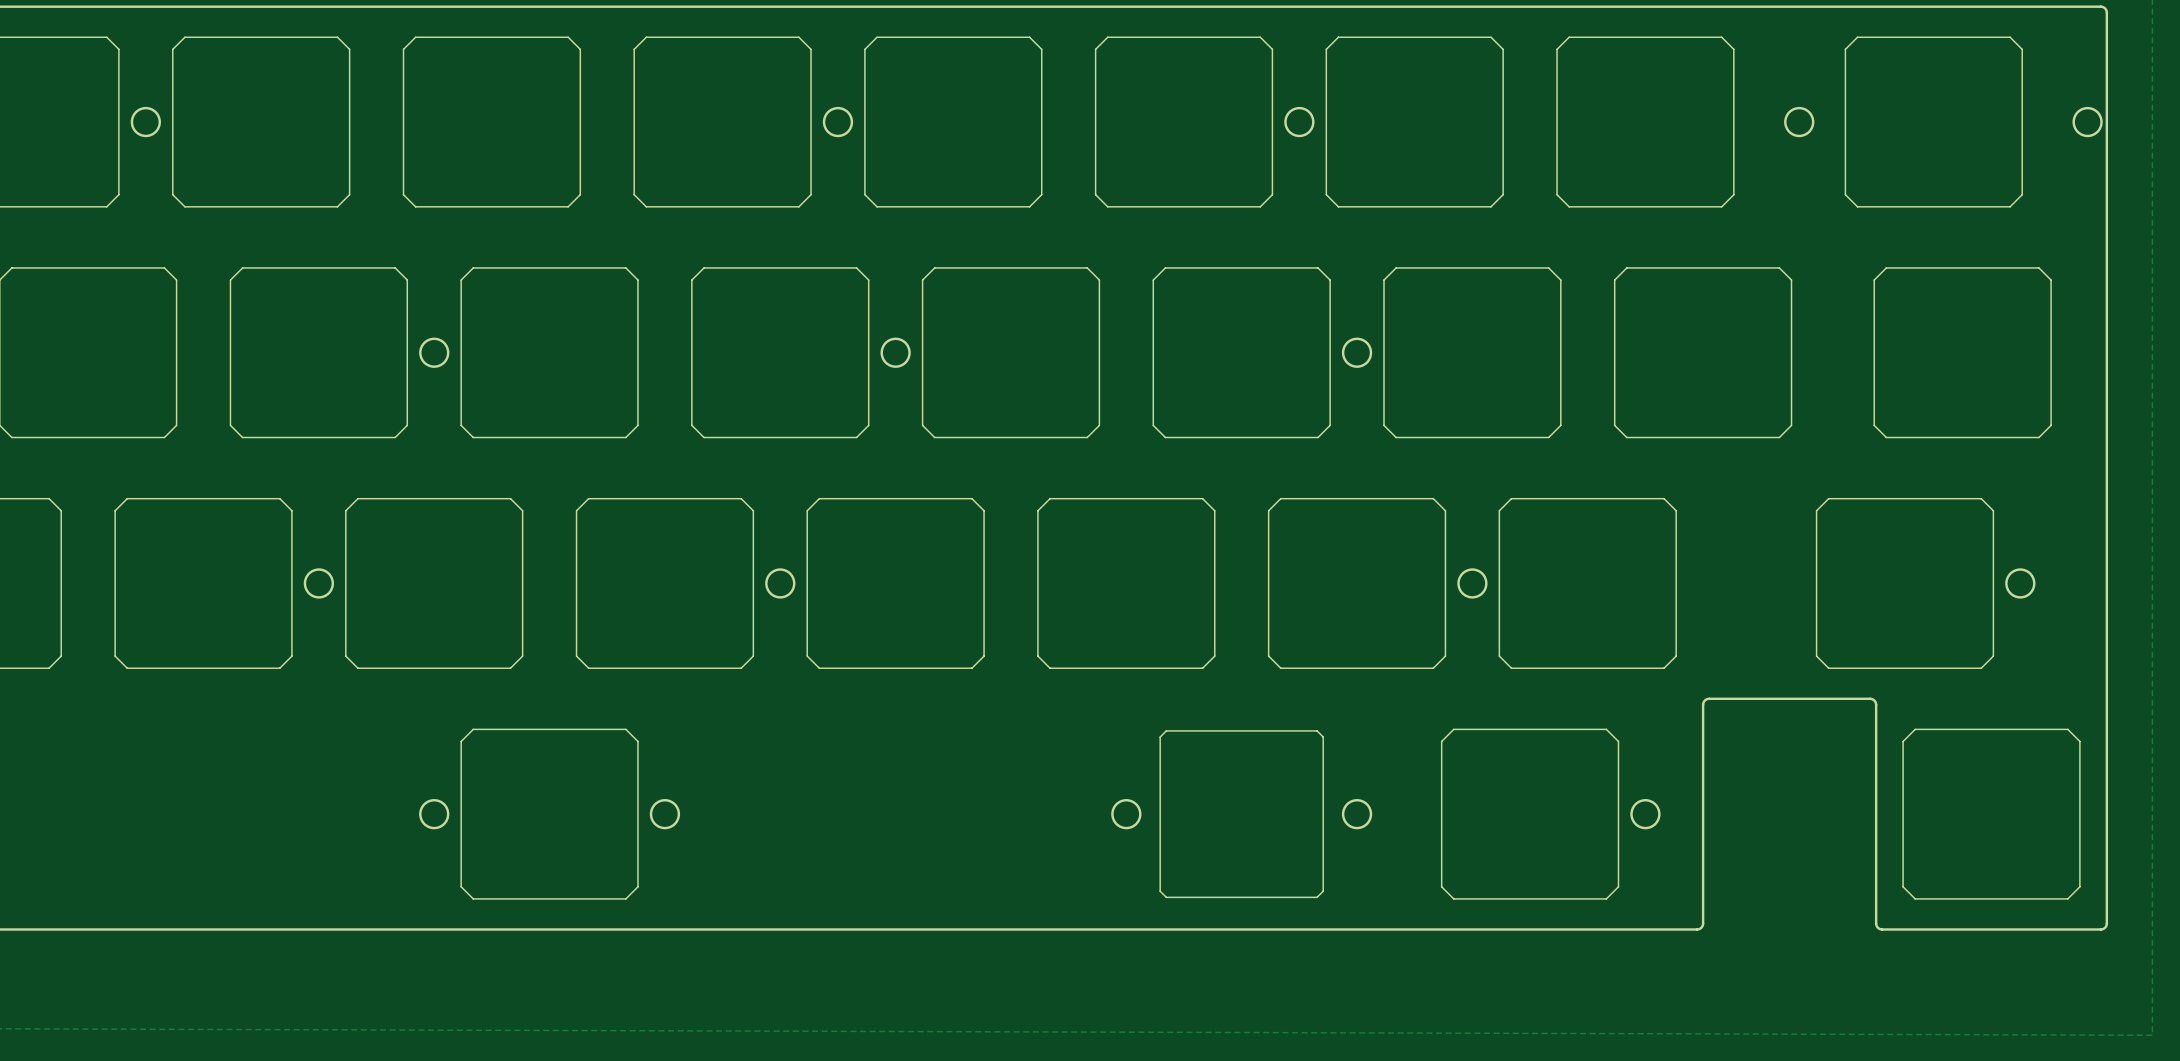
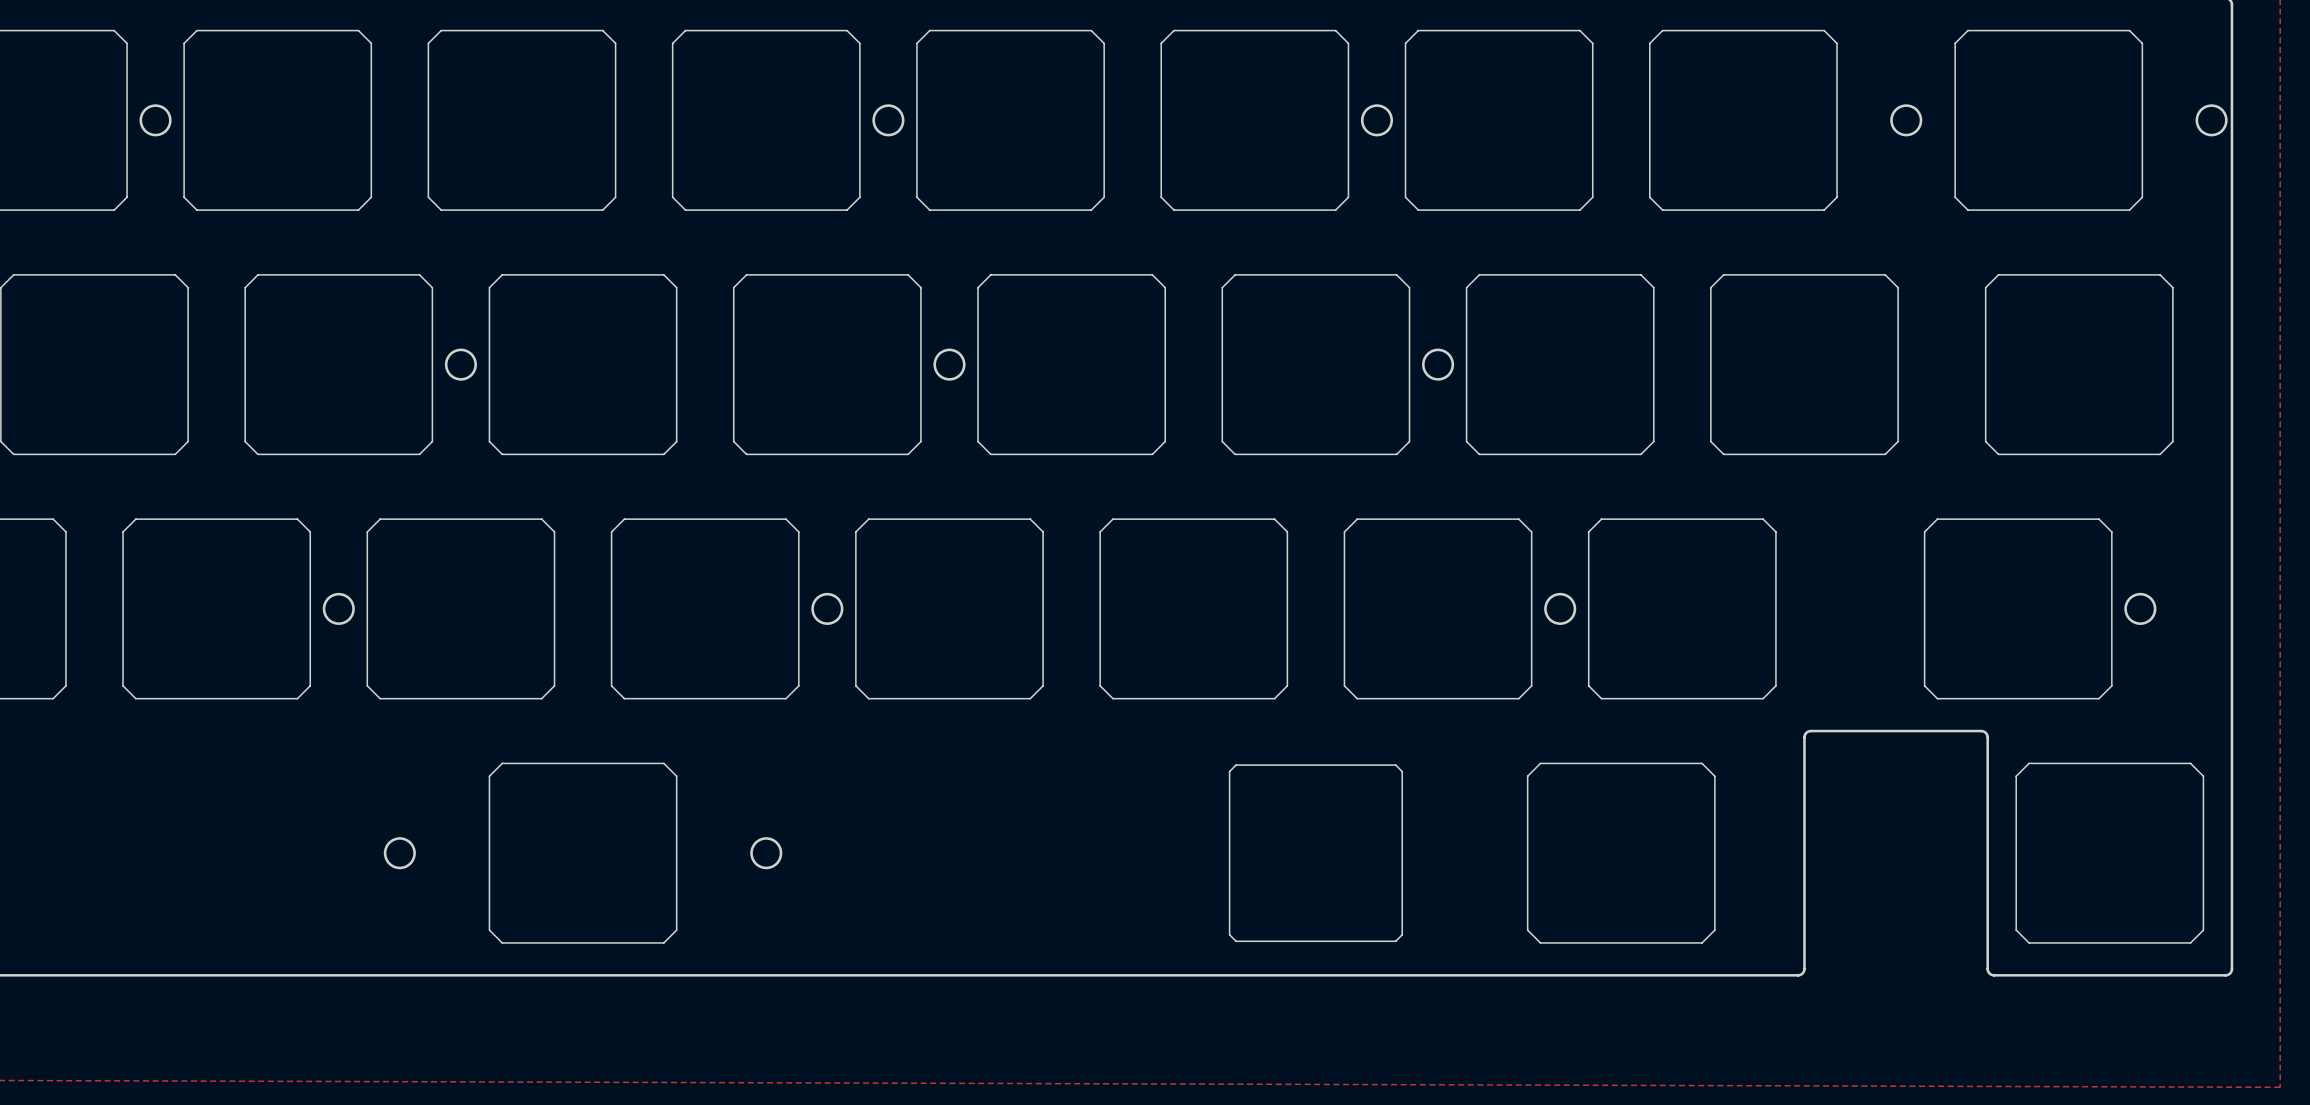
round board edge: [1111, 799, 1142, 830] -> none
round board edge: [1341, 799, 1373, 830] -> none
round board edge: [1630, 799, 1661, 830] -> none
round board edge position: (434, 814) -> (399, 853)
round board edge position: (664, 814) -> (766, 853)

